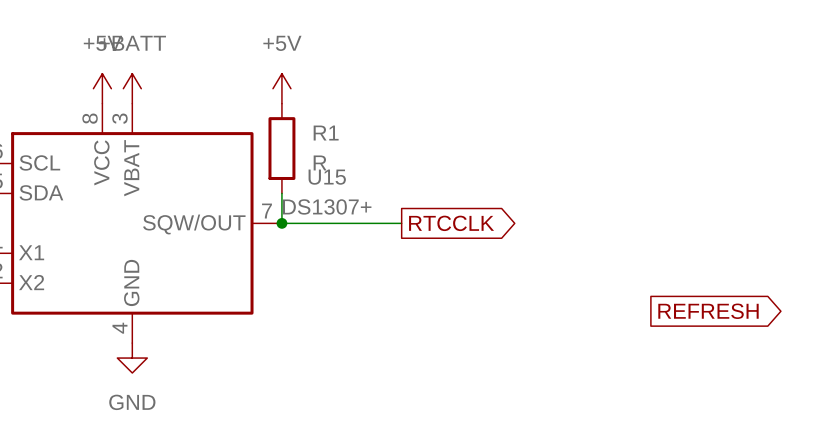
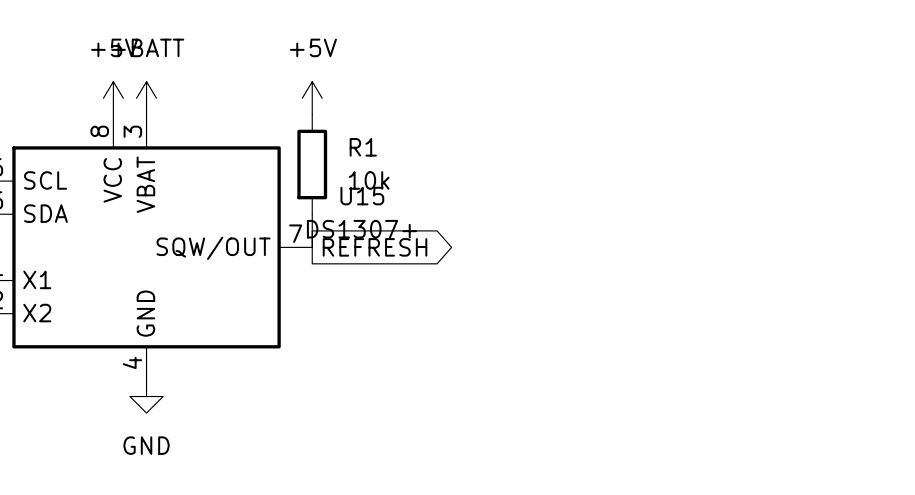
R1 value: R (320, 162) -> 10k (369, 180)
wire: (281, 223) (401, 223) -> none
junction: (281, 223) -> none
global label: none -> REFRESH (375, 247)
global label: RTCCLK (451, 223) -> none
global label: REFRESH (708, 311) -> none

